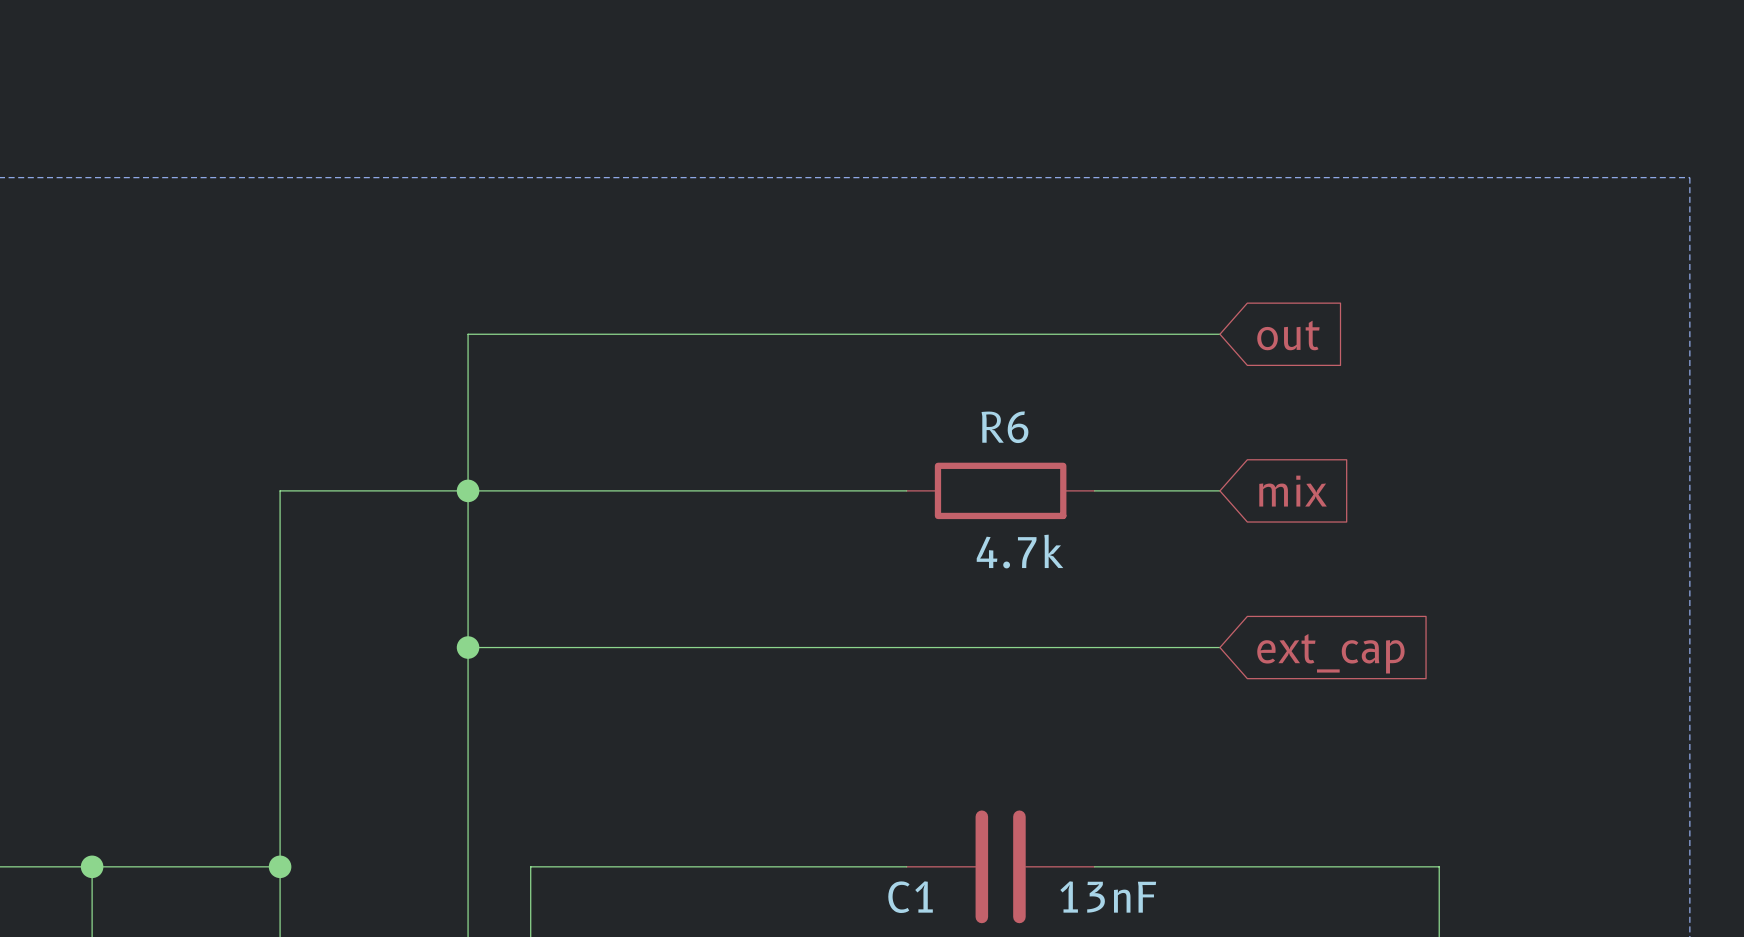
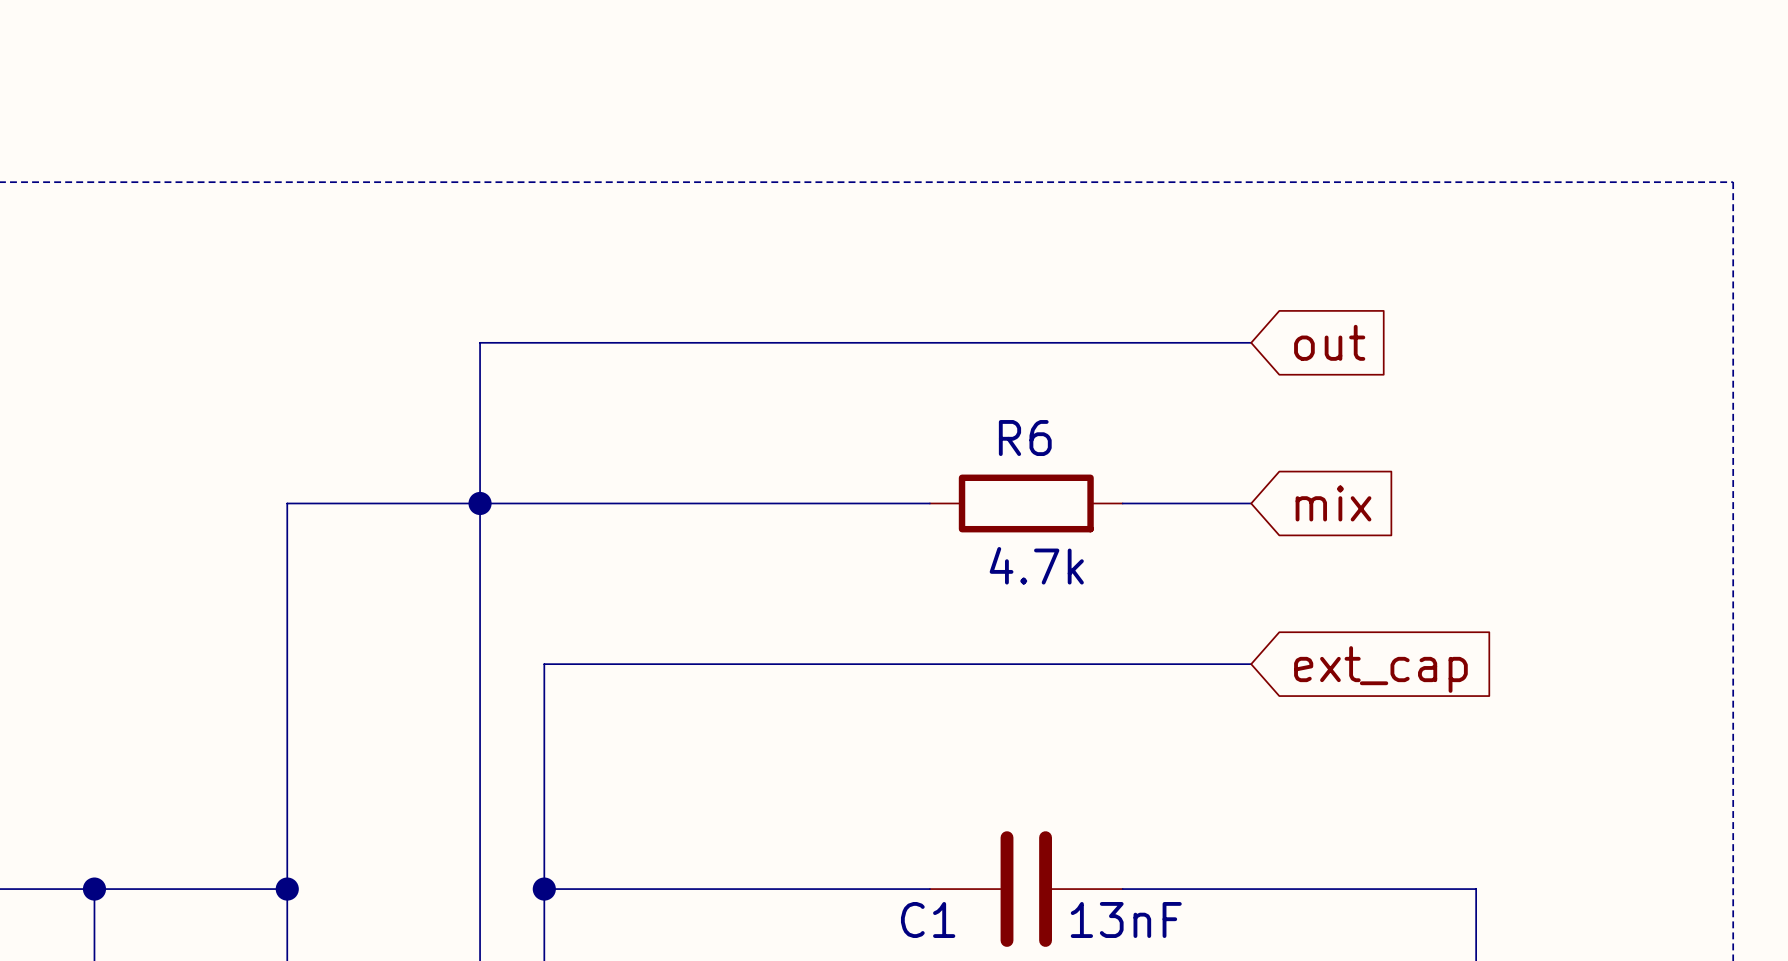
wire: (468, 647) (530, 647) -> (544, 889) (544, 664)
junction: (468, 647) -> none
junction: none -> (544, 889)

